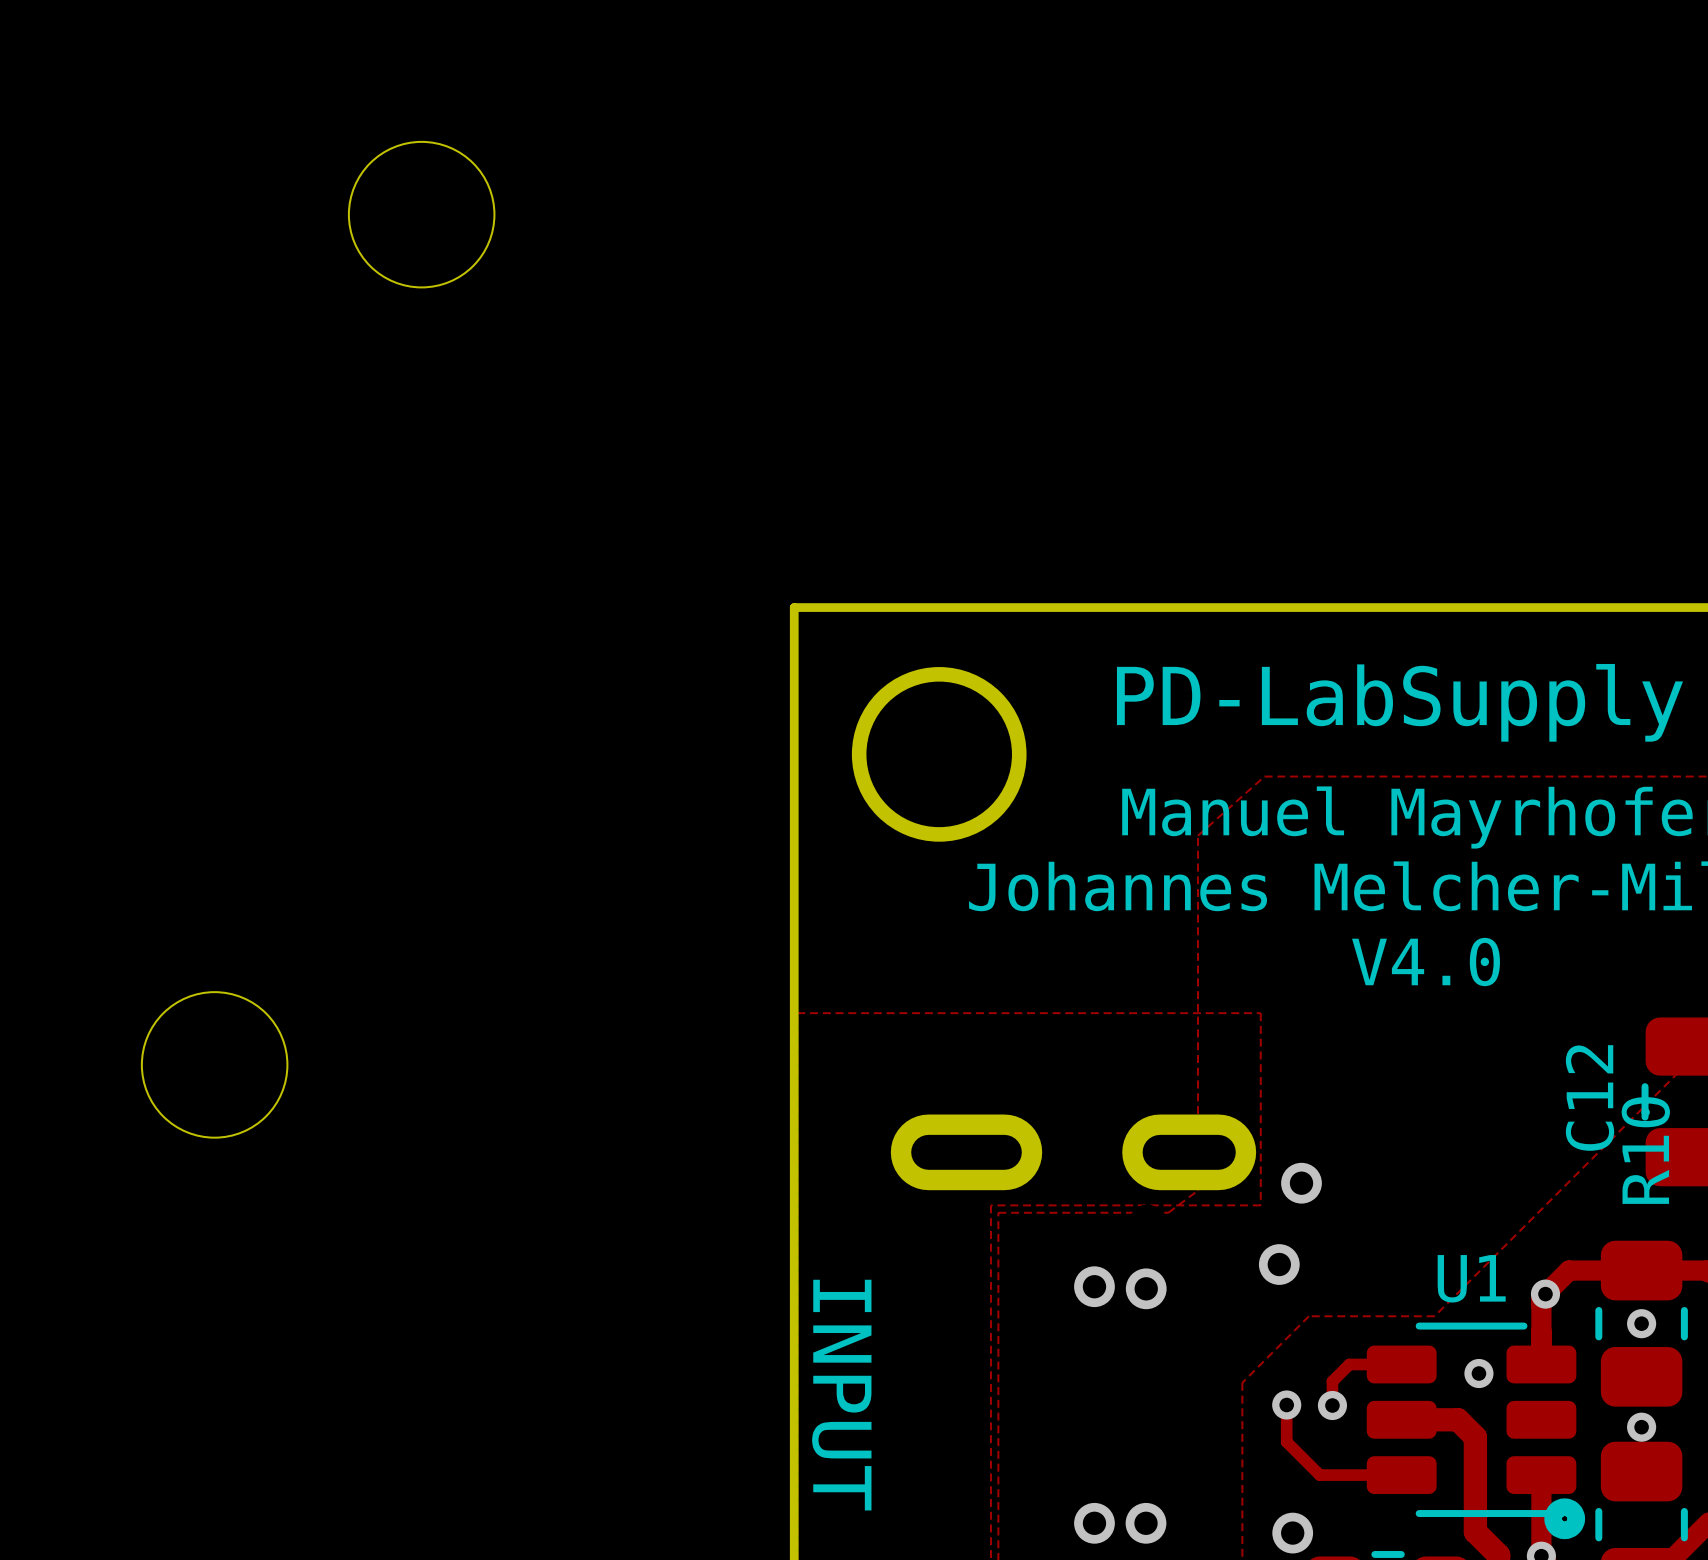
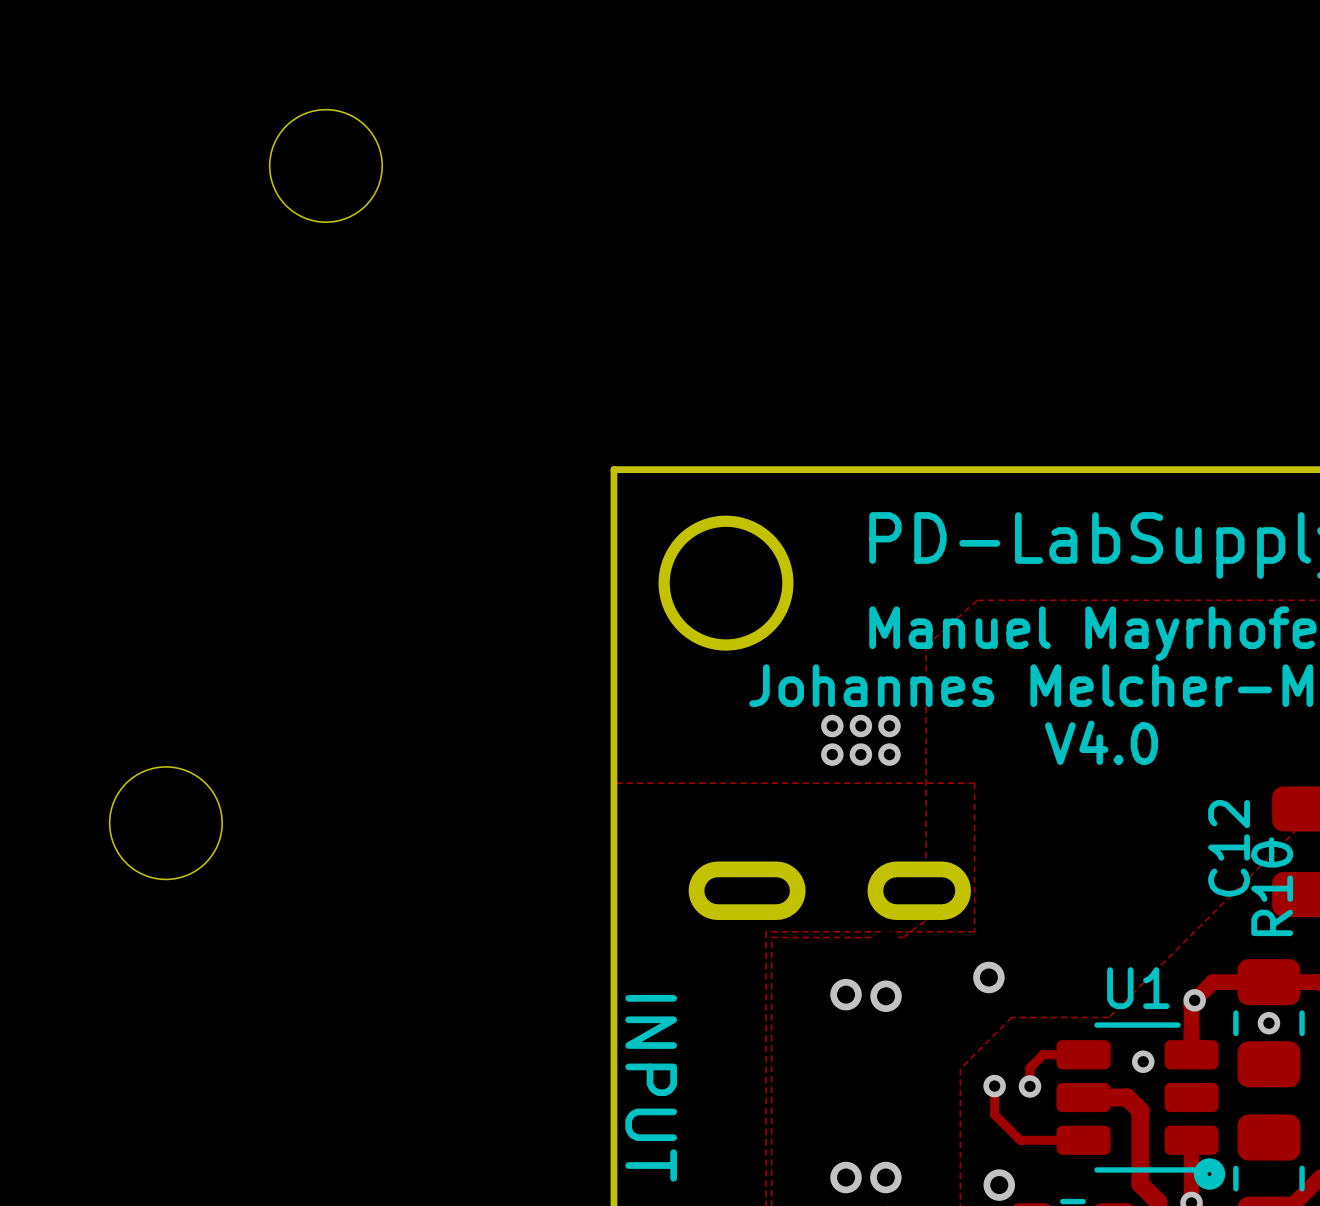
via: none -> (832, 726)
via: none -> (860, 726)
via: none -> (889, 726)
via: none -> (832, 754)
via: none -> (860, 754)
via: none -> (889, 754)
via: (1301, 1183) -> none
via: (1641, 1427) -> none

